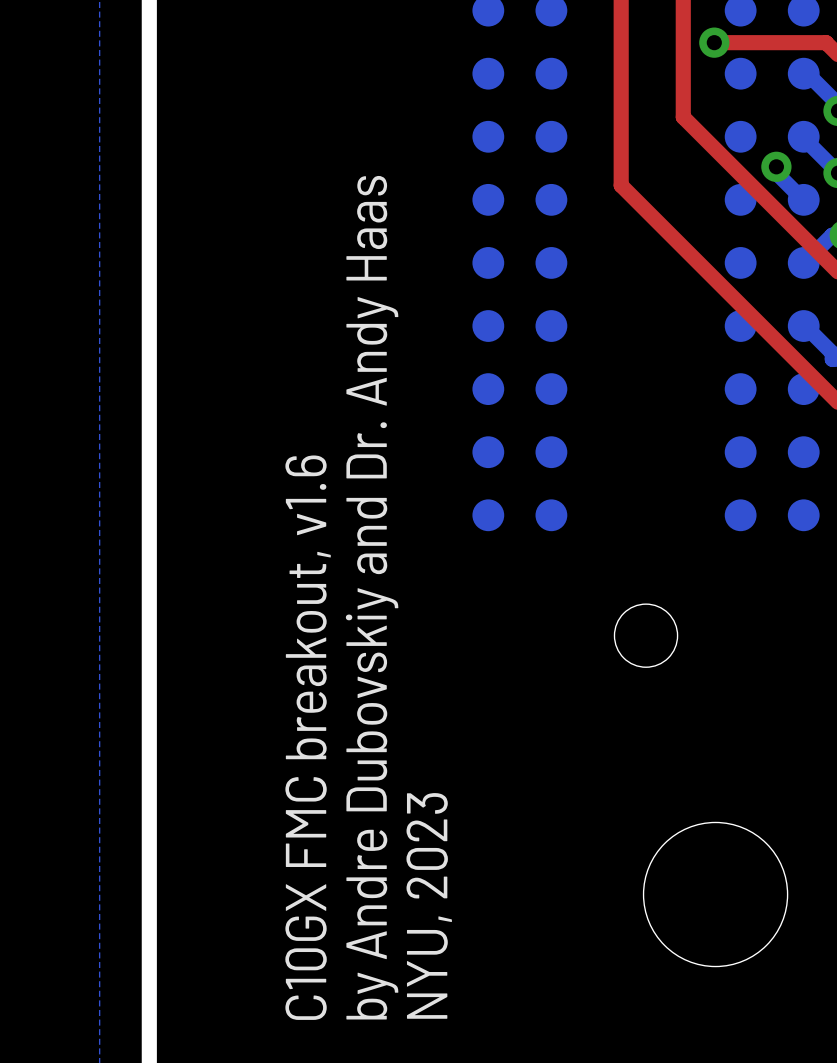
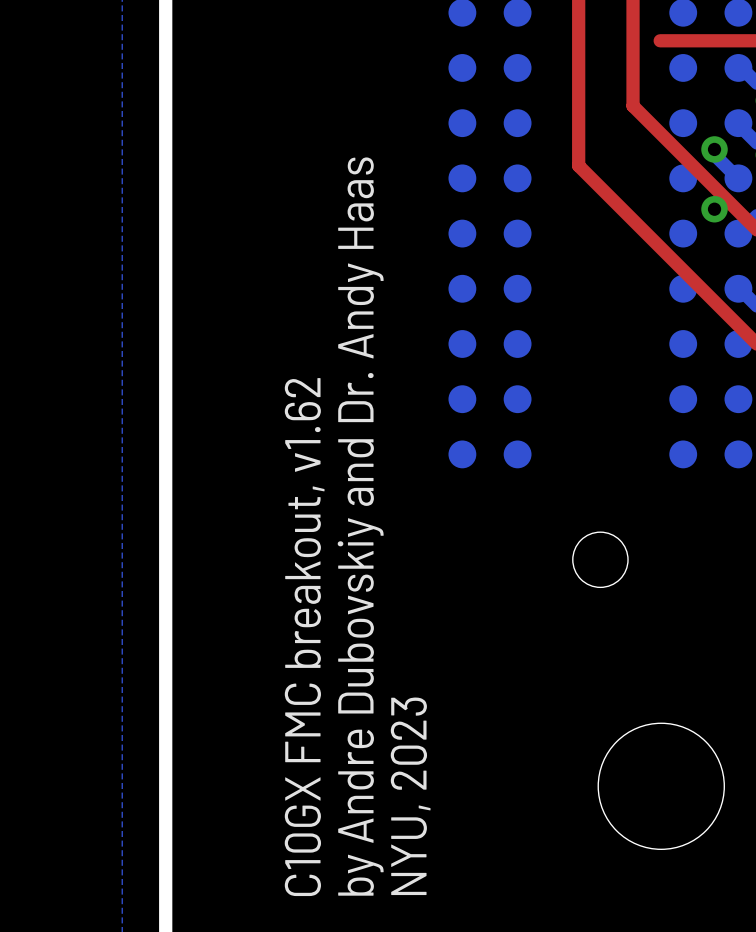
via: (714, 42) -> none
via: none -> (714, 209)
text: C10GX FMC breakout, v1.6 (308, 737) -> C10GX FMC breakout, v1.62 (304, 637)

